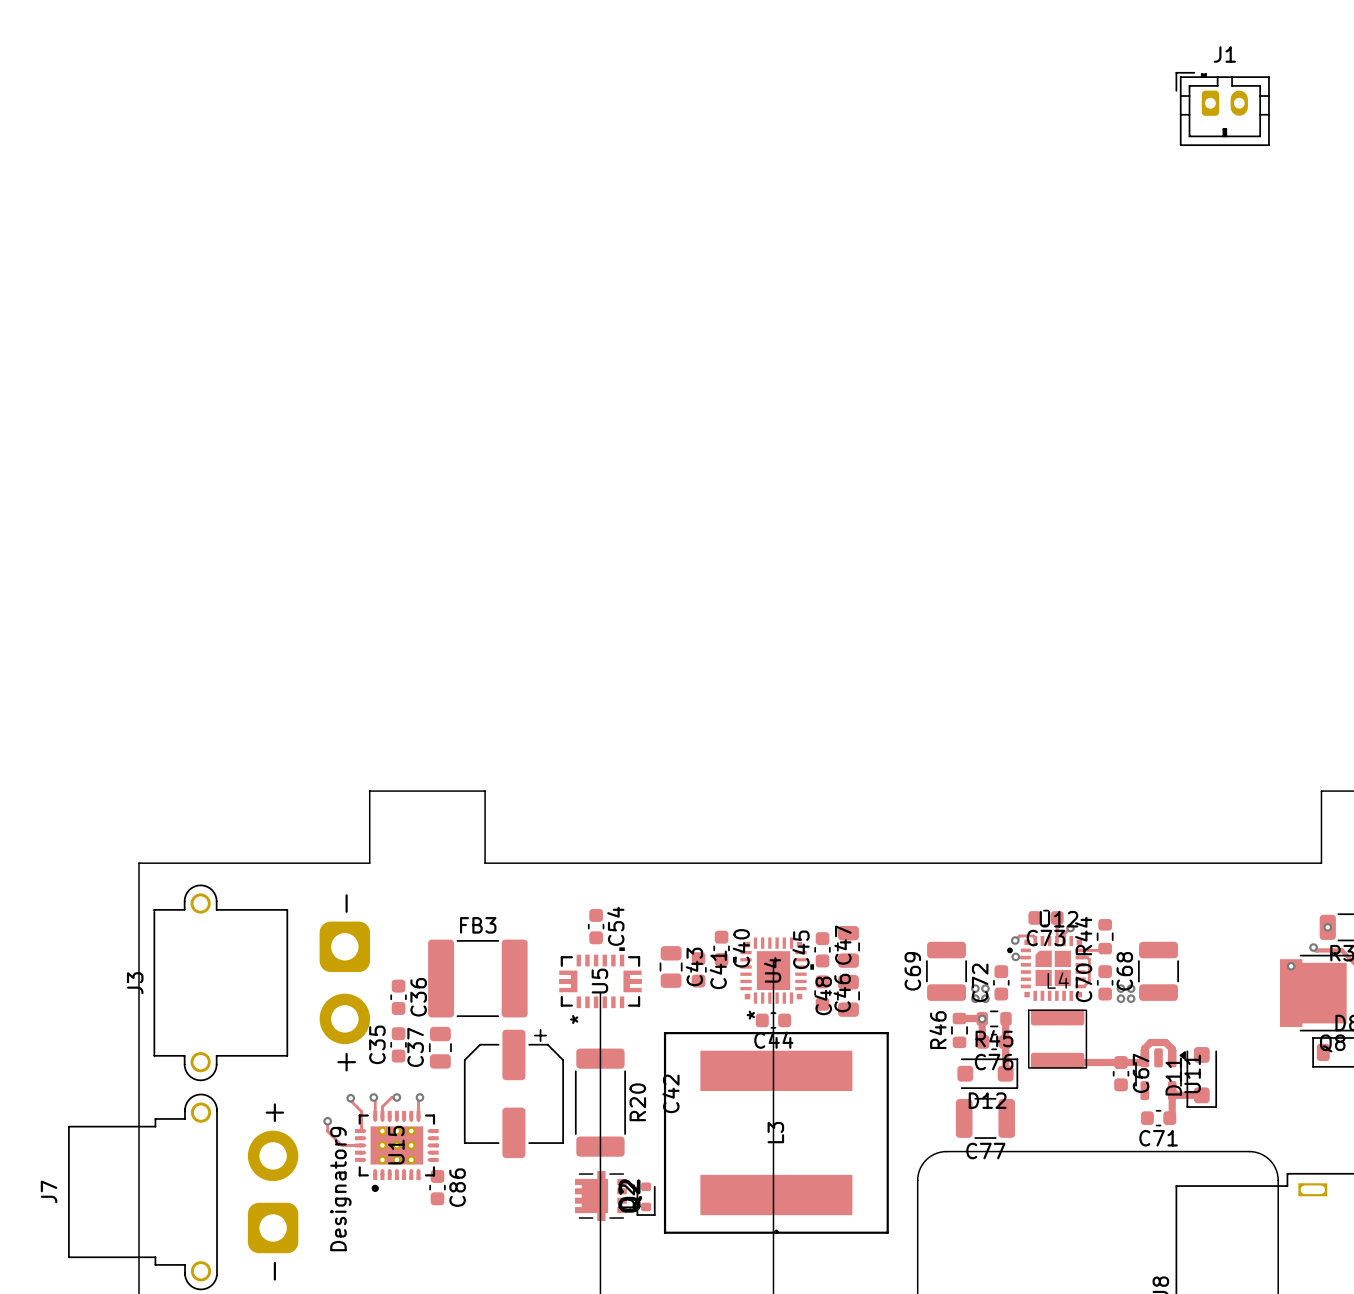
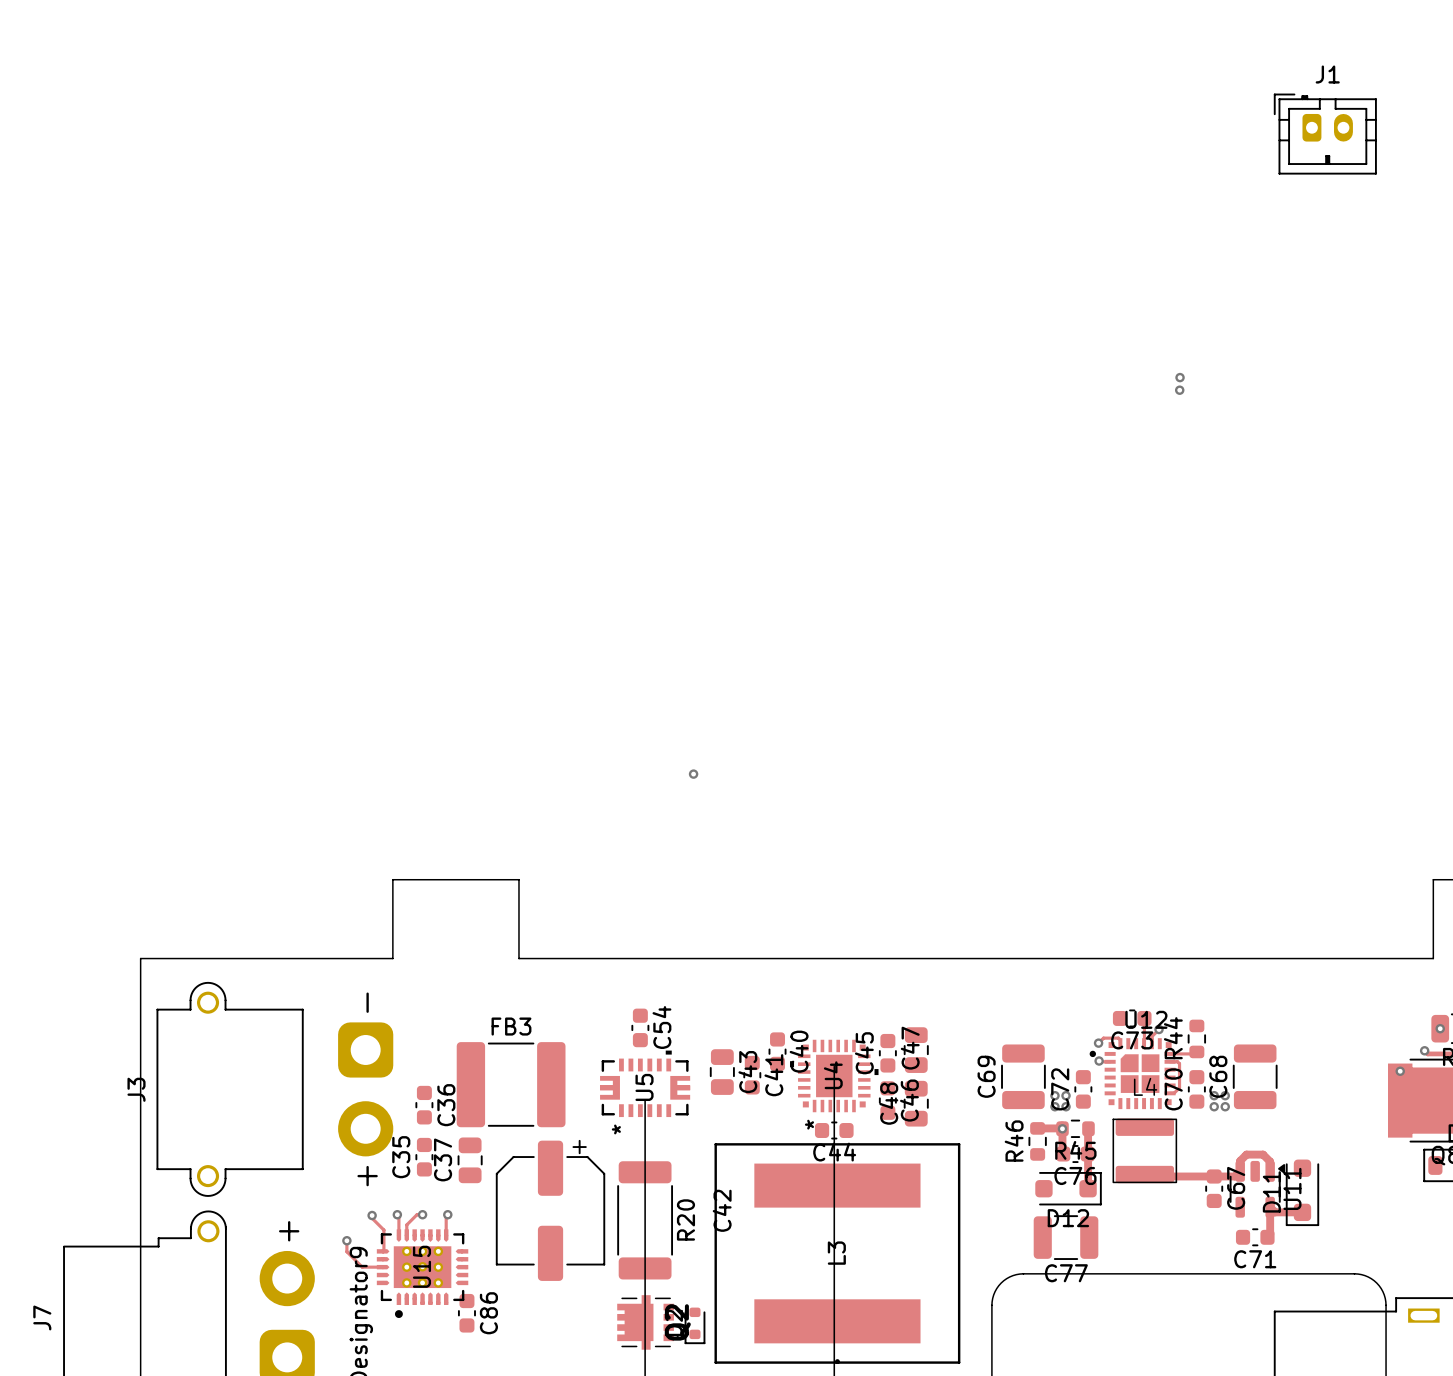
via: none -> (1180, 377)
via: none -> (1179, 390)
via: none -> (693, 774)

